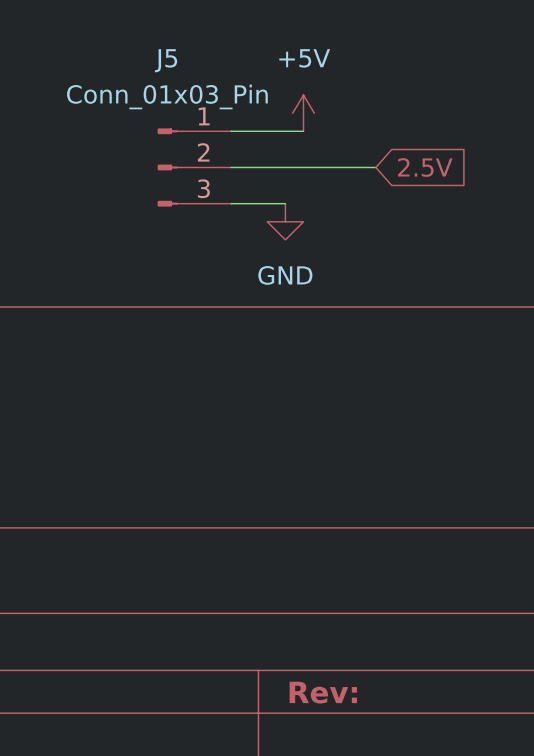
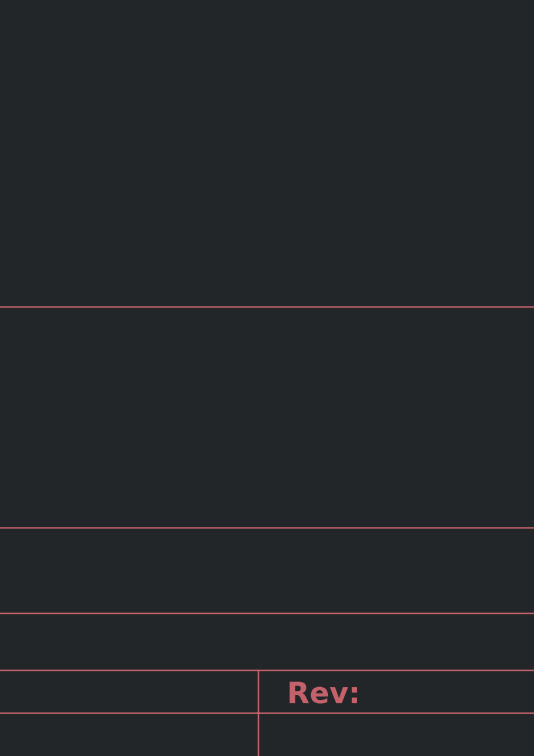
power symbol: +5V (303, 113) -> none
wire: (231, 131) (303, 131) -> none
J5: Conn_01x03_Pin (194, 167) -> none
wire: (231, 167) (375, 167) -> none
global label: 2.5V (425, 167) -> none
wire: (231, 203) (285, 203) -> none
power symbol: GND (285, 221) -> none

